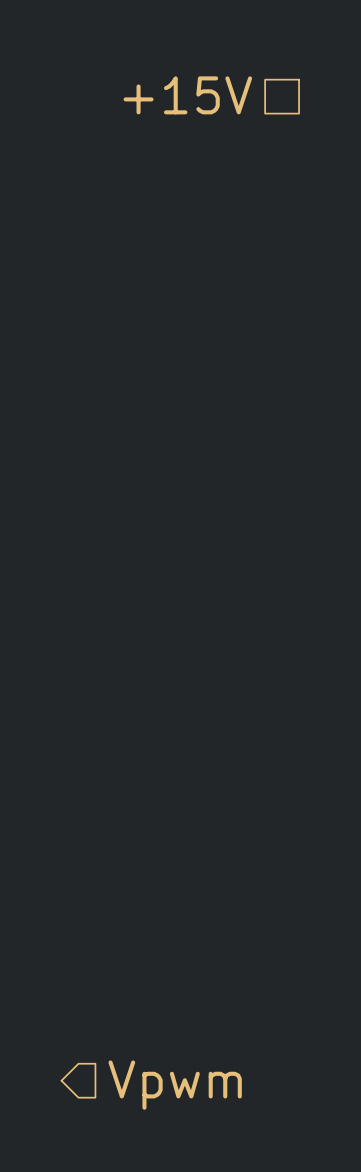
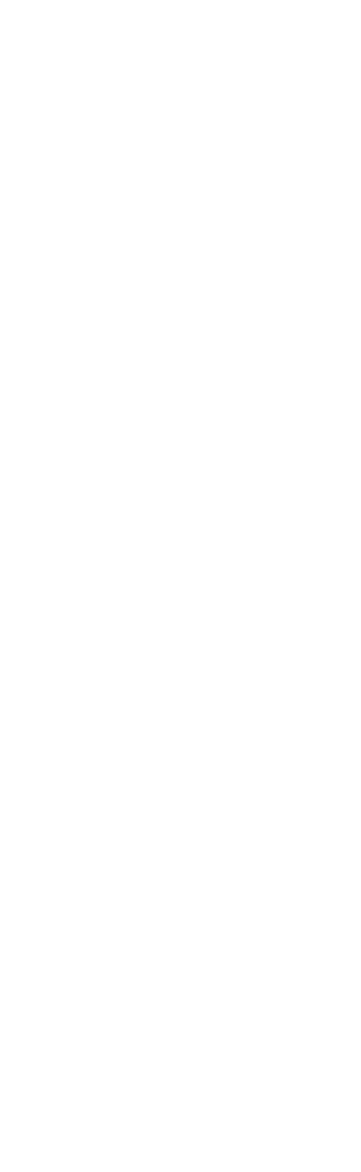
hierarchical label: +15V (187, 95) -> none
hierarchical label: Vpwm (175, 1085) -> none

